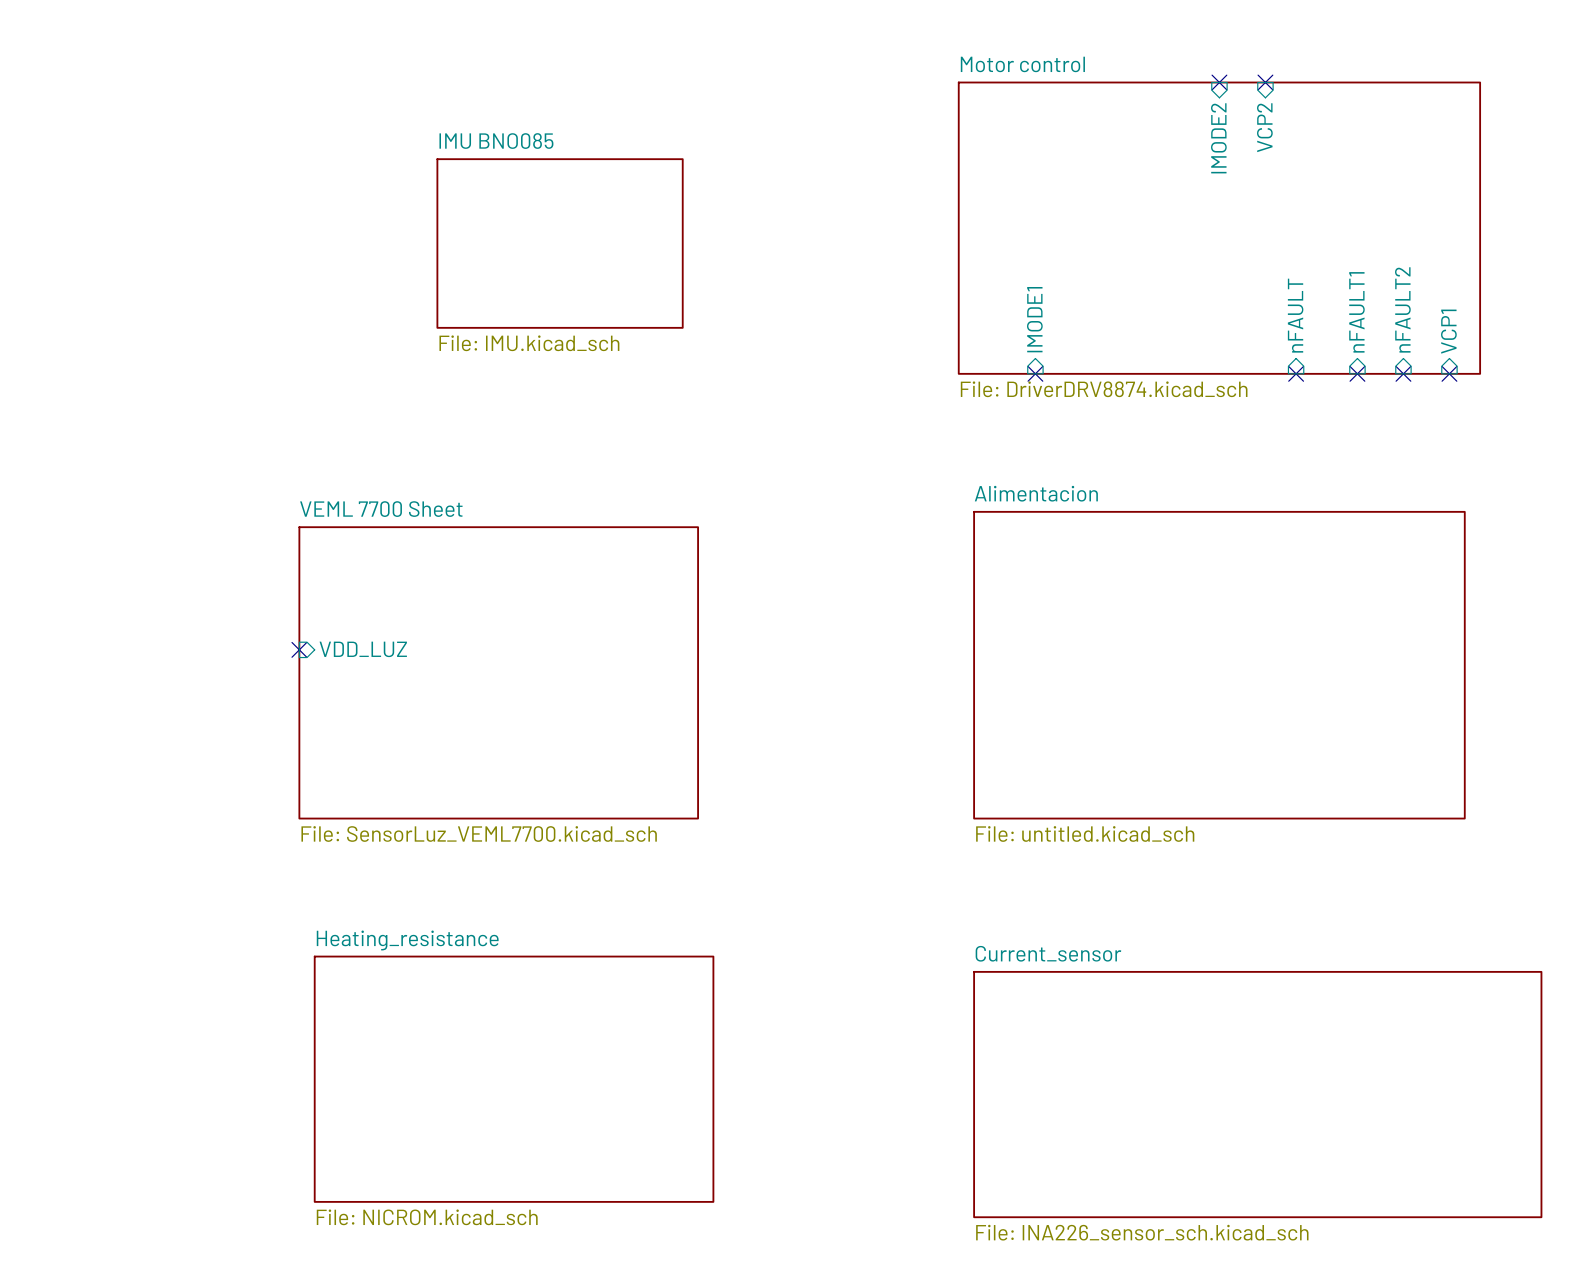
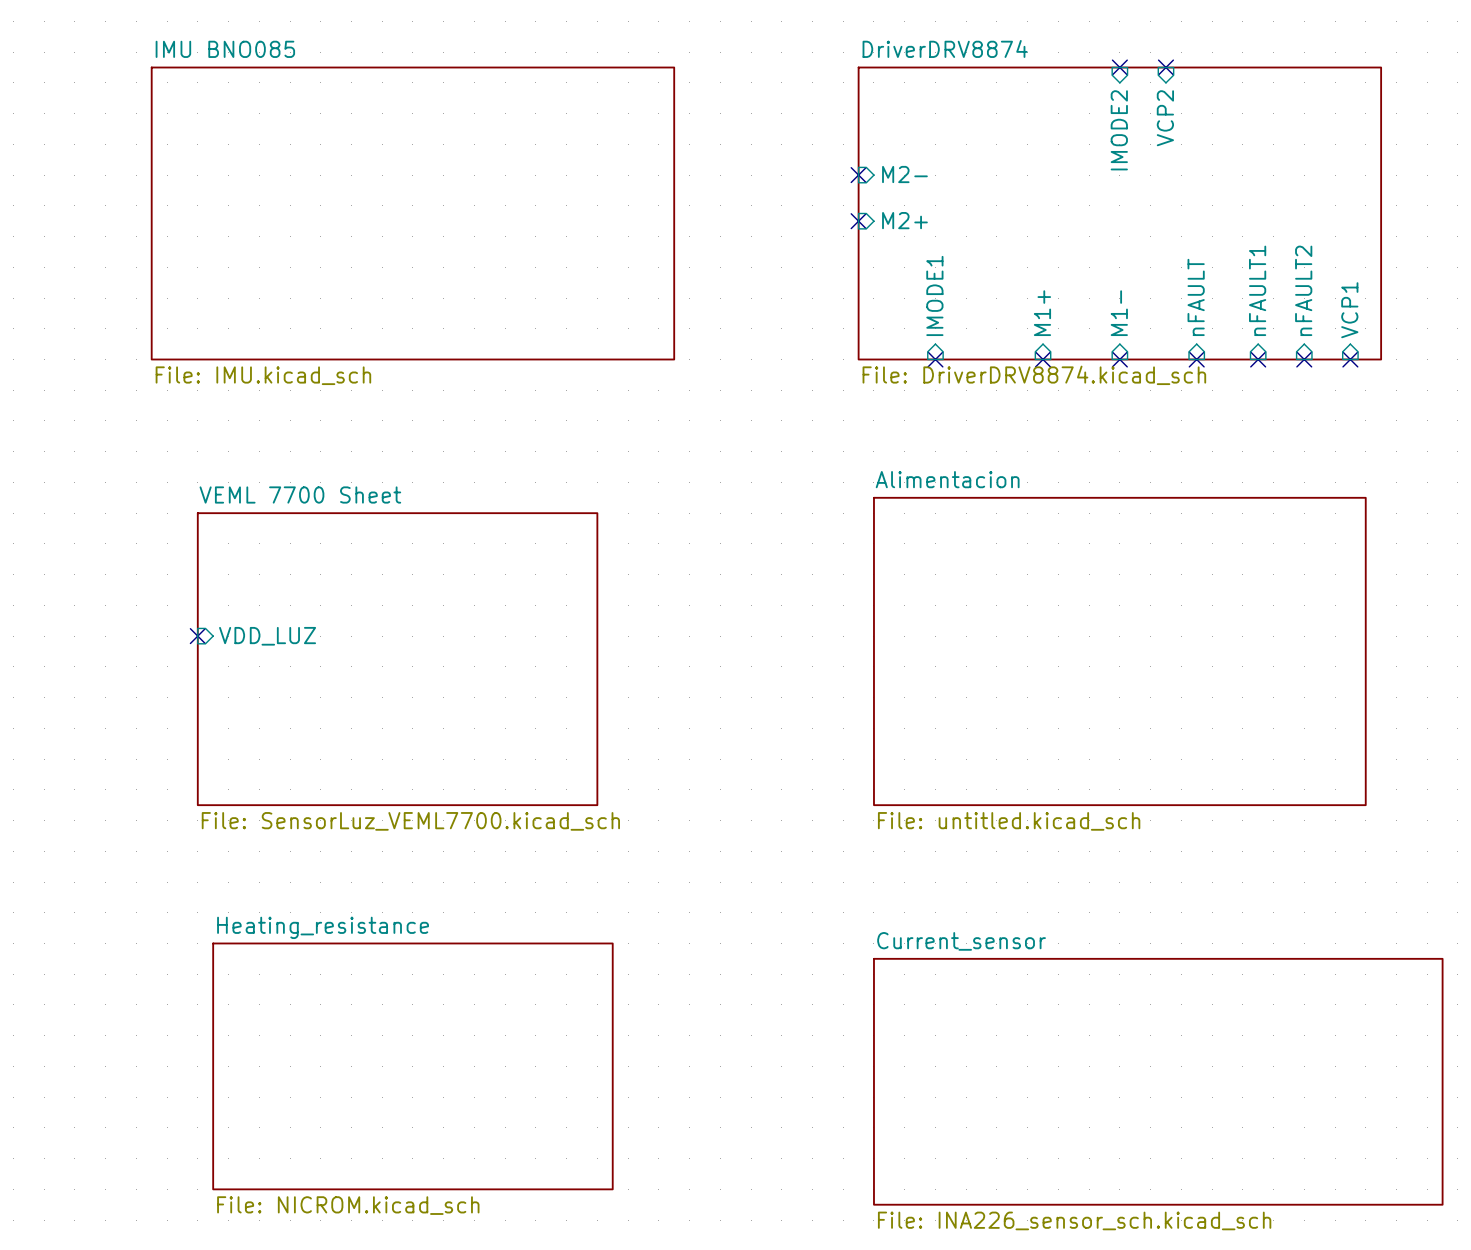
sheet Motor control name: Motor control (1022, 64) -> DriverDRV8874 (945, 48)
sheet IMU BNO085 name position: IMU BNO085 (496, 141) -> IMU BNO085 (225, 49)
sheet IMU BNO085 shape: [436, 158, 684, 329] -> [150, 66, 676, 361]
no-connect mark: none -> (858, 175)
sheet pin: none -> M2- (904, 174)
no-connect mark: none -> (858, 221)
sheet pin: none -> M2+ (904, 220)
sheet pin: none -> M1+ (1042, 313)
sheet pin: none -> M1- (1119, 313)
sheet IMU BNO085 value position: File: IMU.kicad_sch (529, 343) -> File: IMU.kicad_sch (263, 375)
no-connect mark: none -> (1043, 359)
no-connect mark: none -> (1119, 359)

